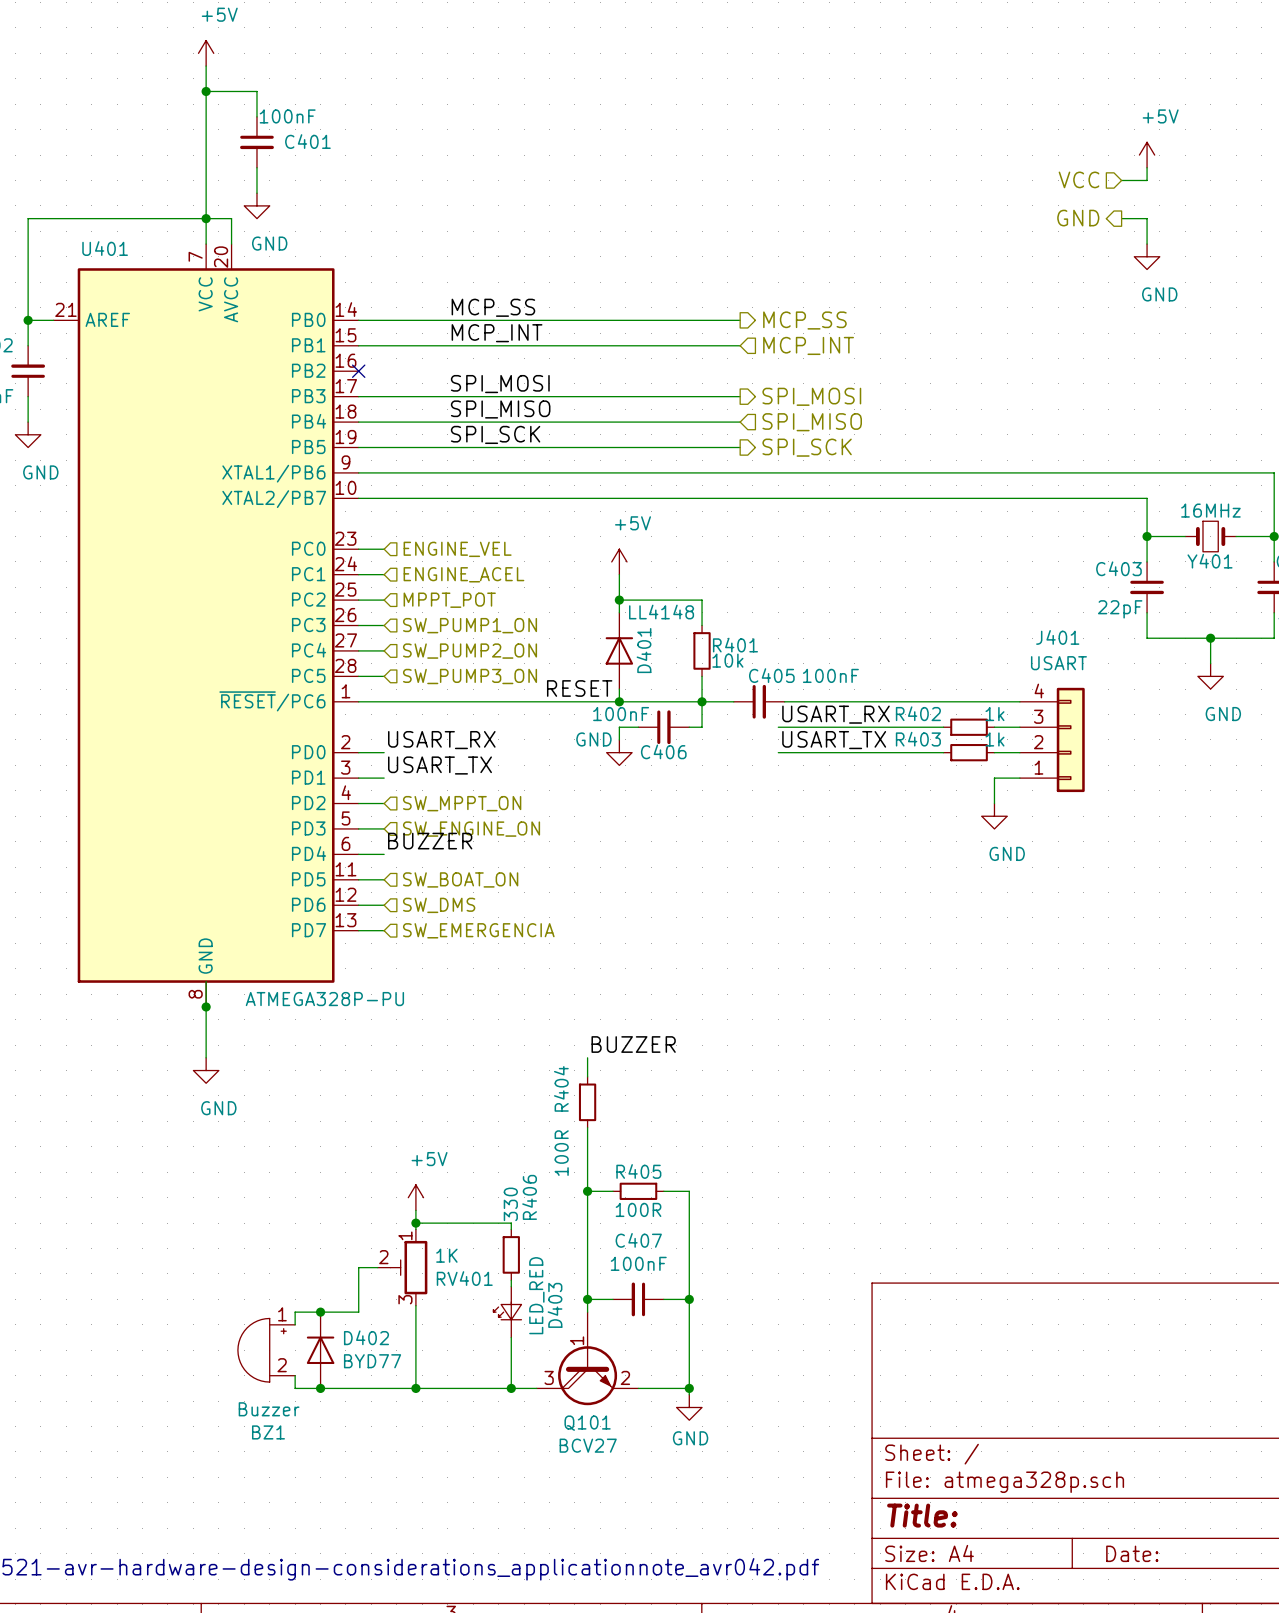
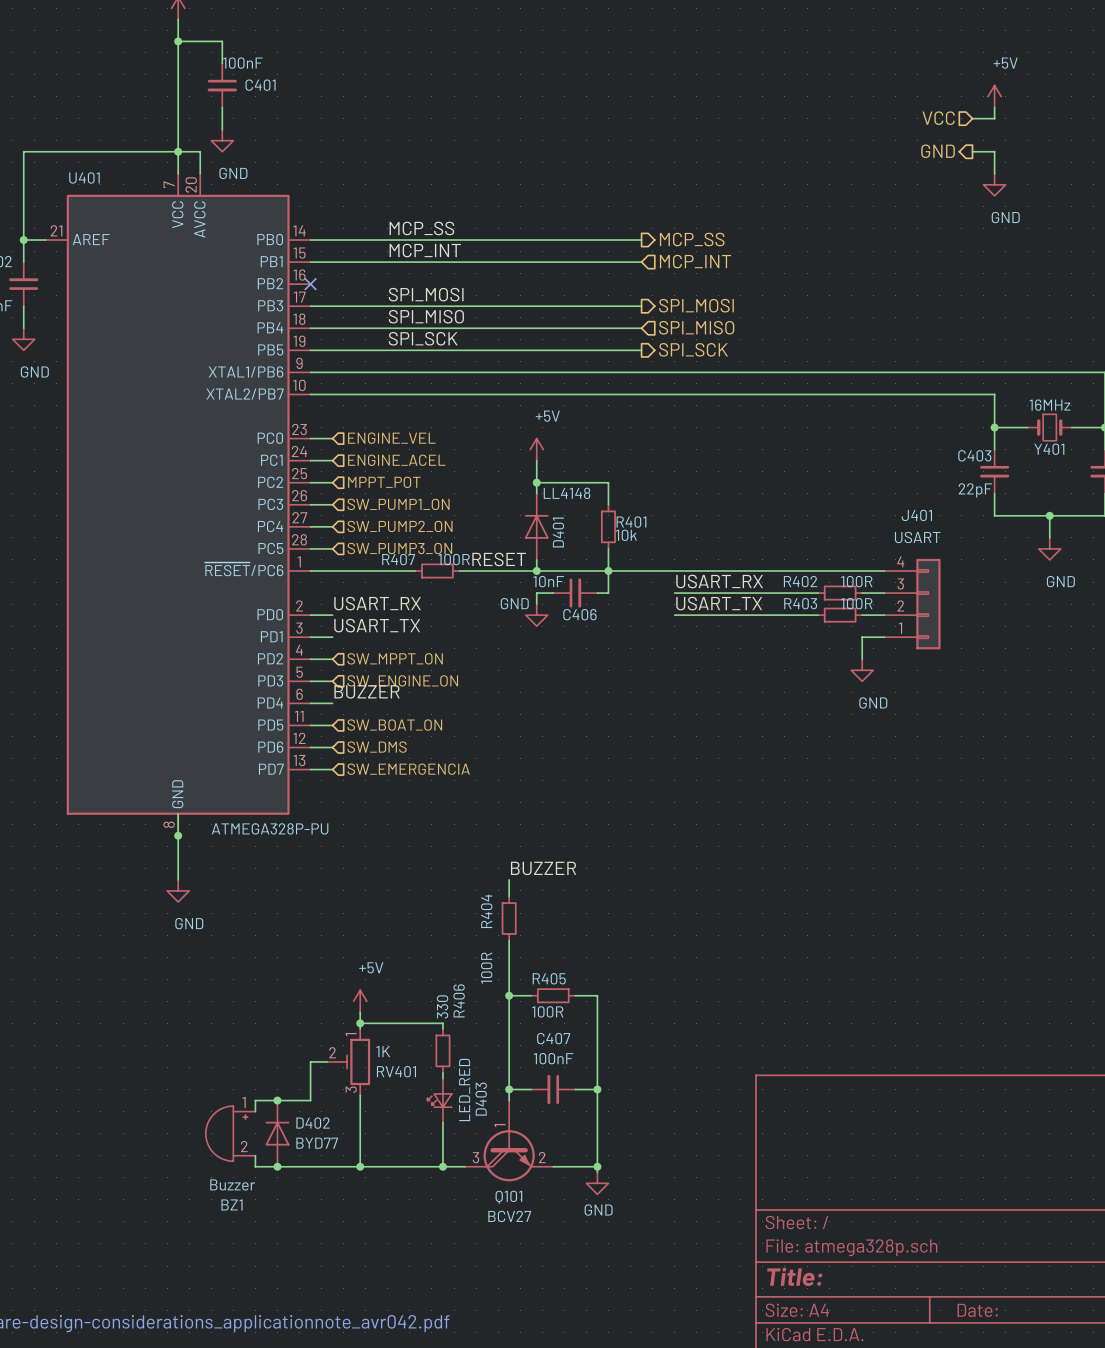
wire: (479, 701) (530, 701) -> none
R407: none -> 100R (437, 570)
C405: 100nF (759, 701) -> none
C406 value: 100nF (621, 714) -> 10nF (548, 581)
R402 value: 1k (994, 714) -> 100R (856, 581)
R403 value: 1k (994, 739) -> 100R (856, 603)

